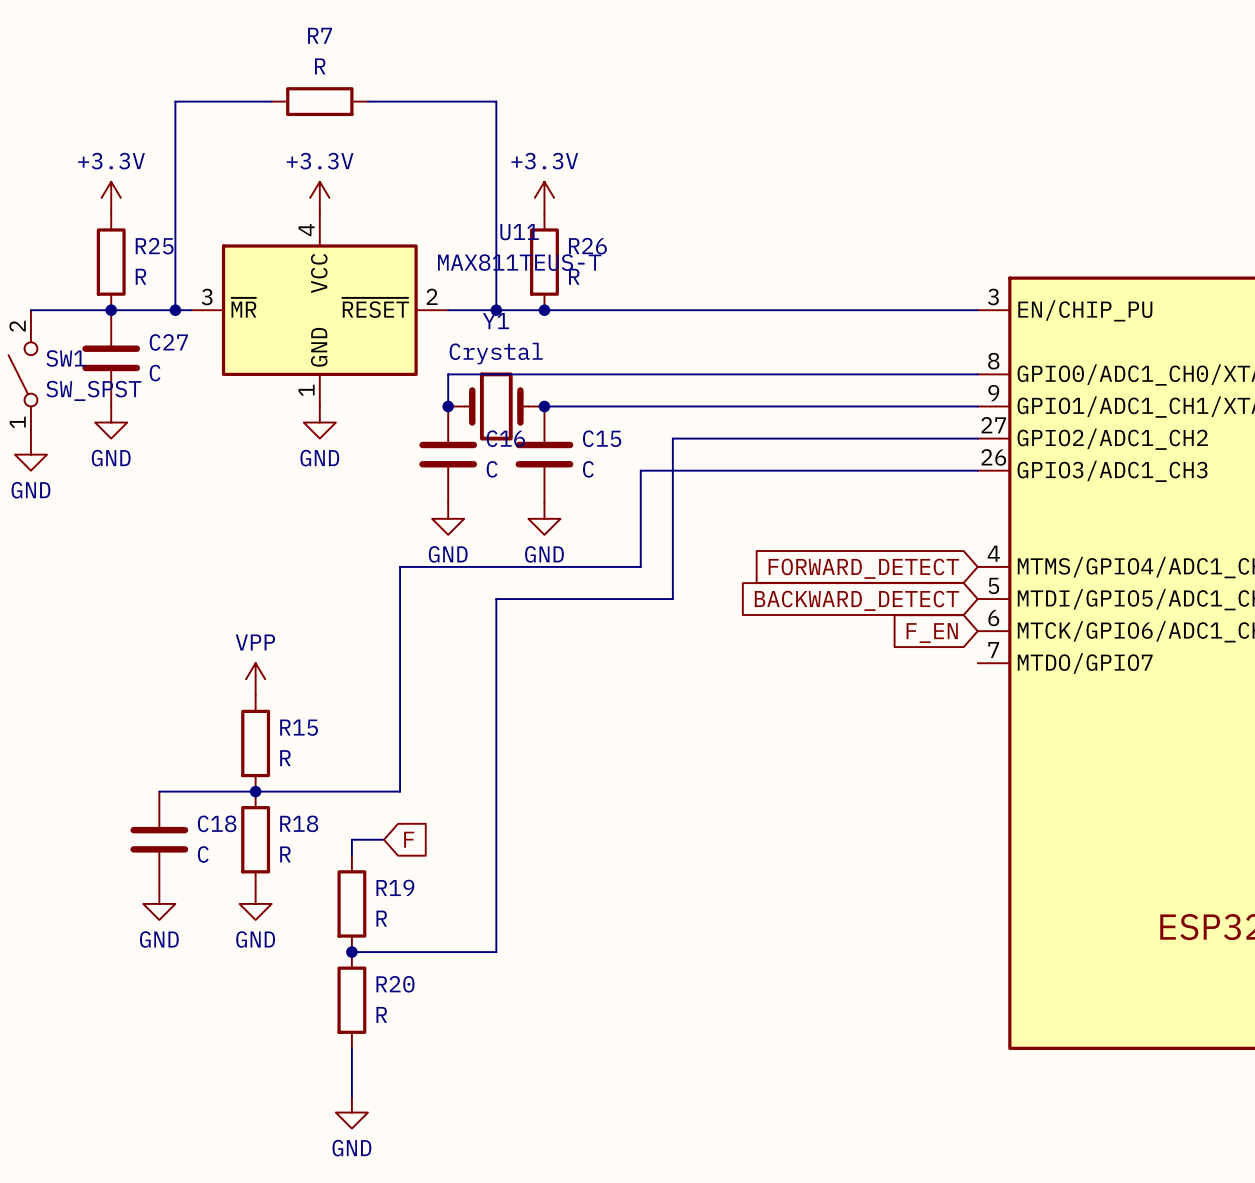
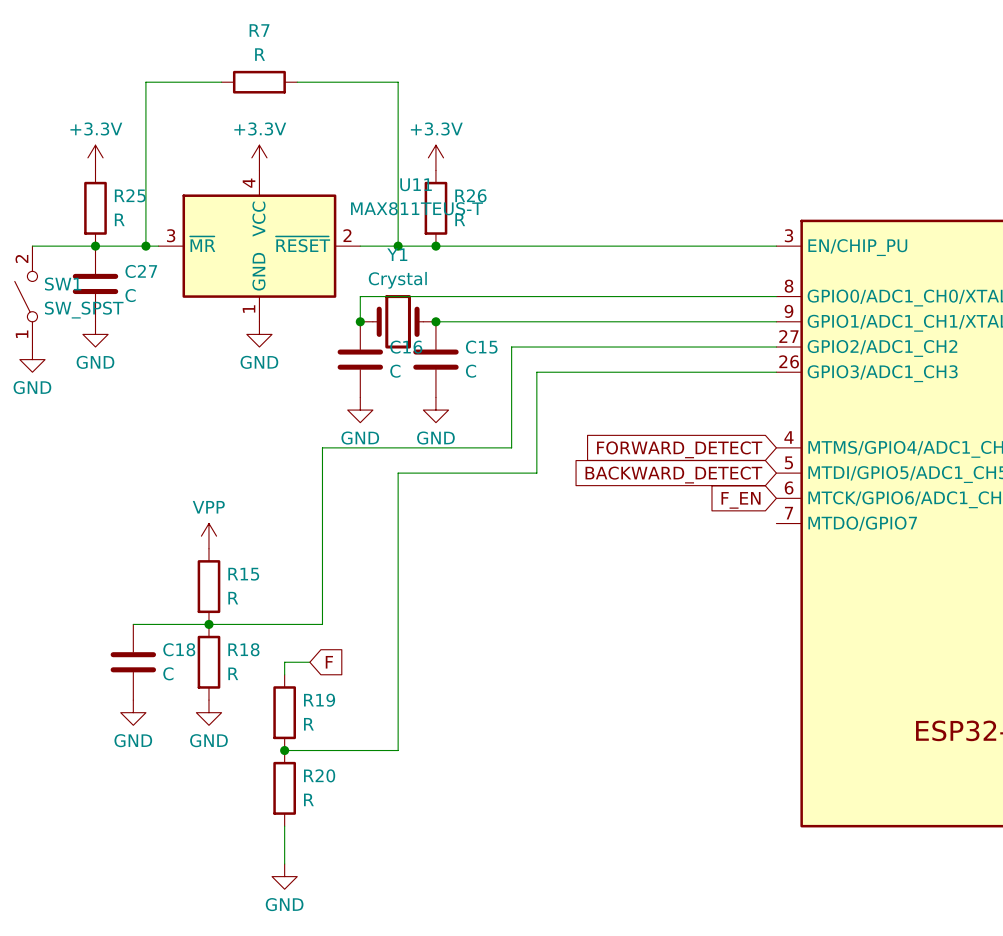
wire: (672, 438) (672, 470) (640, 470) -> (536, 347) (511, 347) (511, 372)

